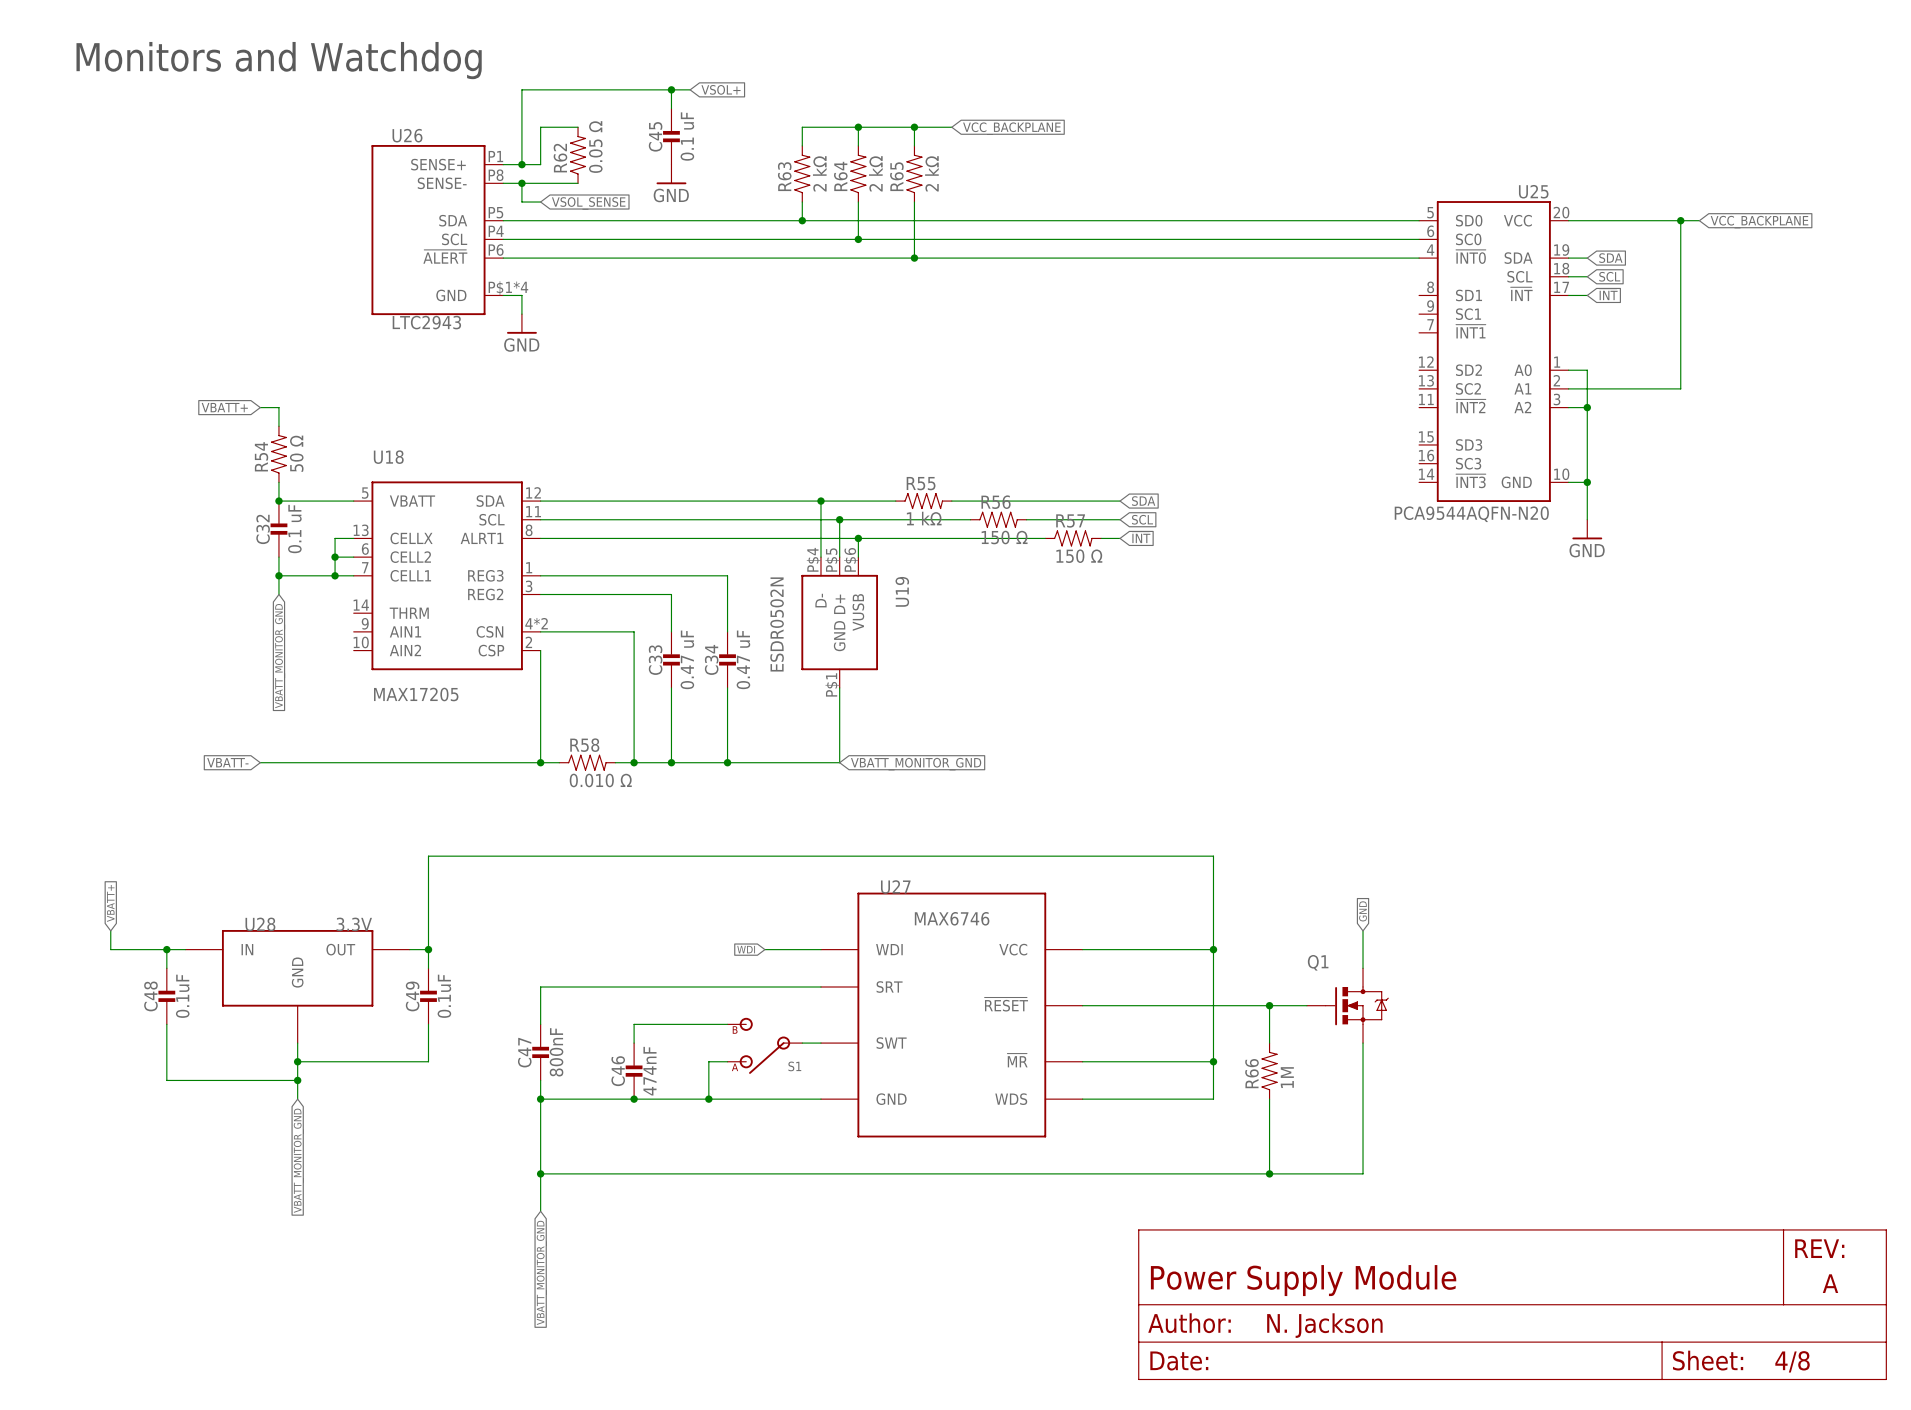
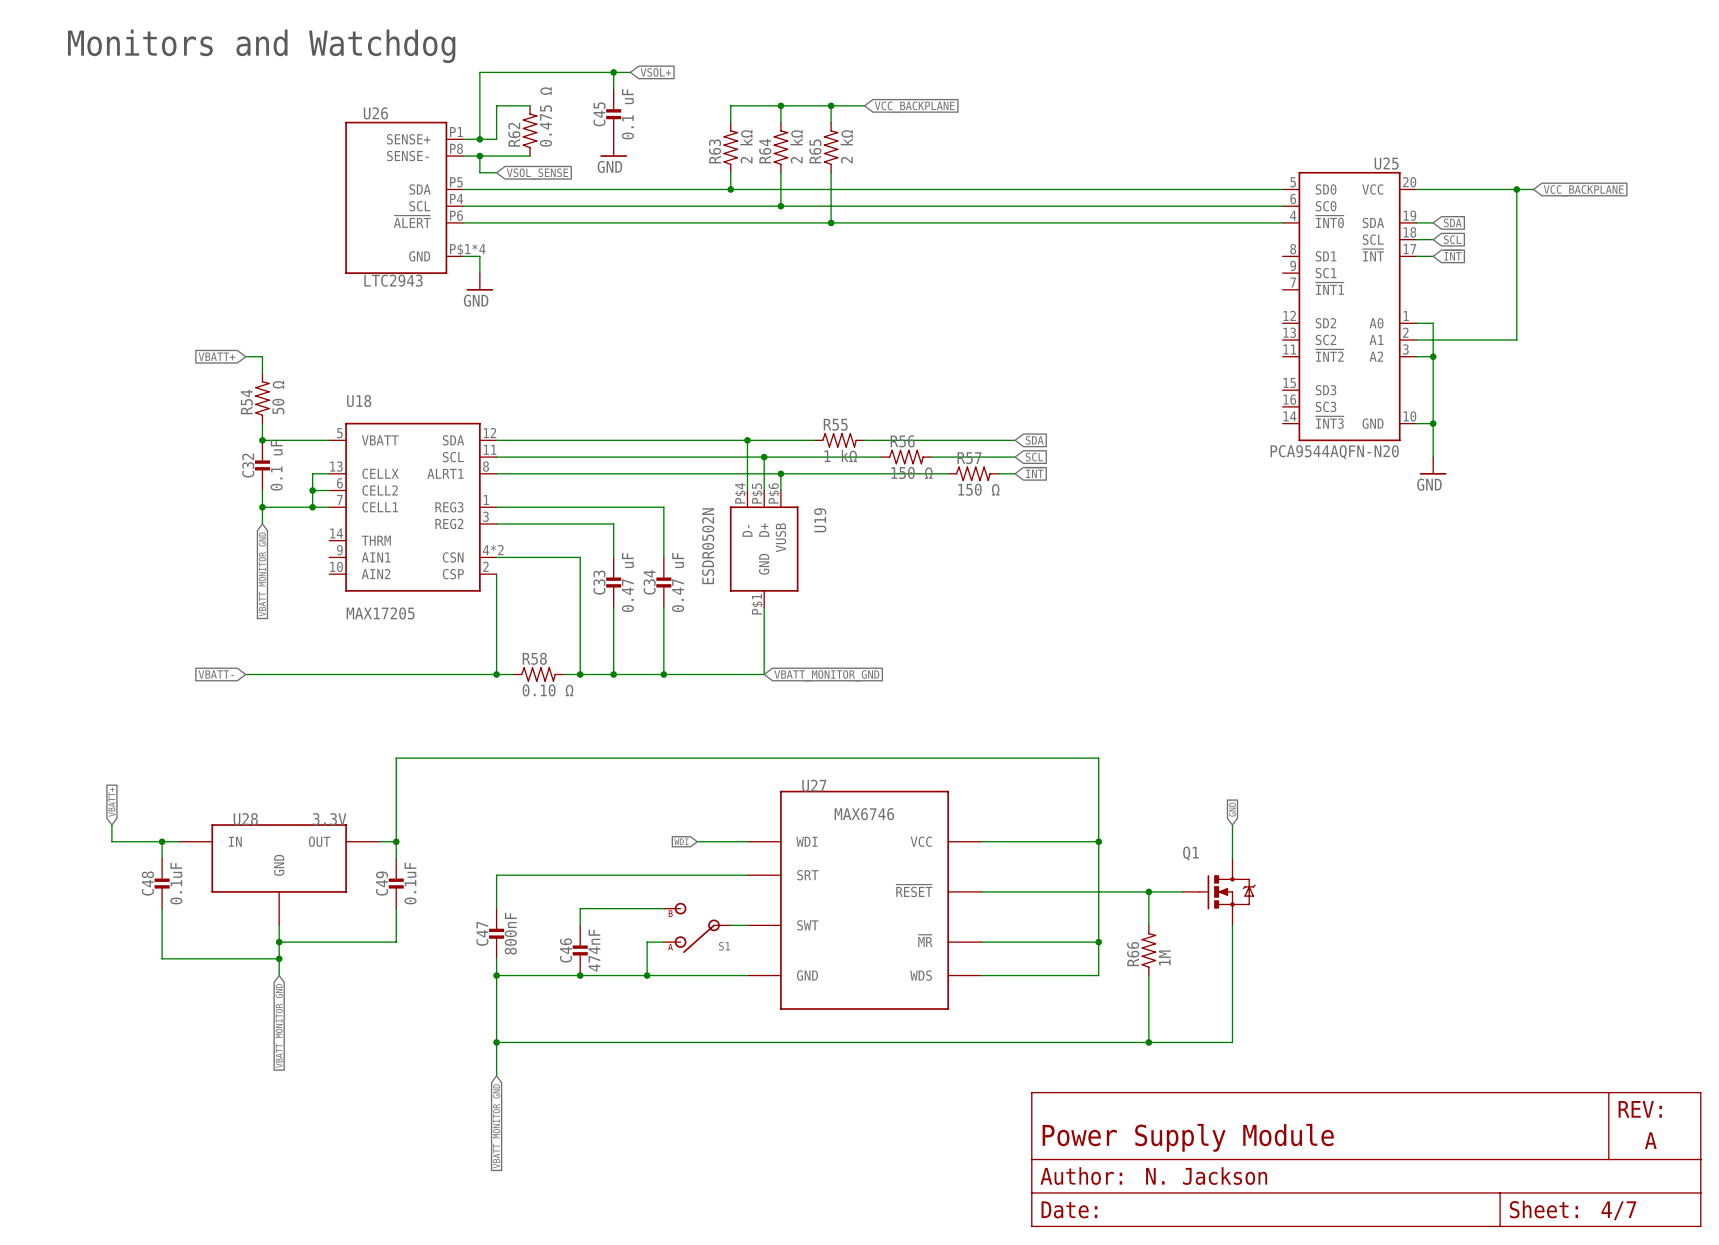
R62 value: 0.05 Ω (595, 147) -> 0.475 Ω (545, 117)
R58 value: 0.010 Ω (600, 780) -> 0.10 Ω (547, 690)
part text: 4/8 (1792, 1361) -> 4/7 (1618, 1210)

